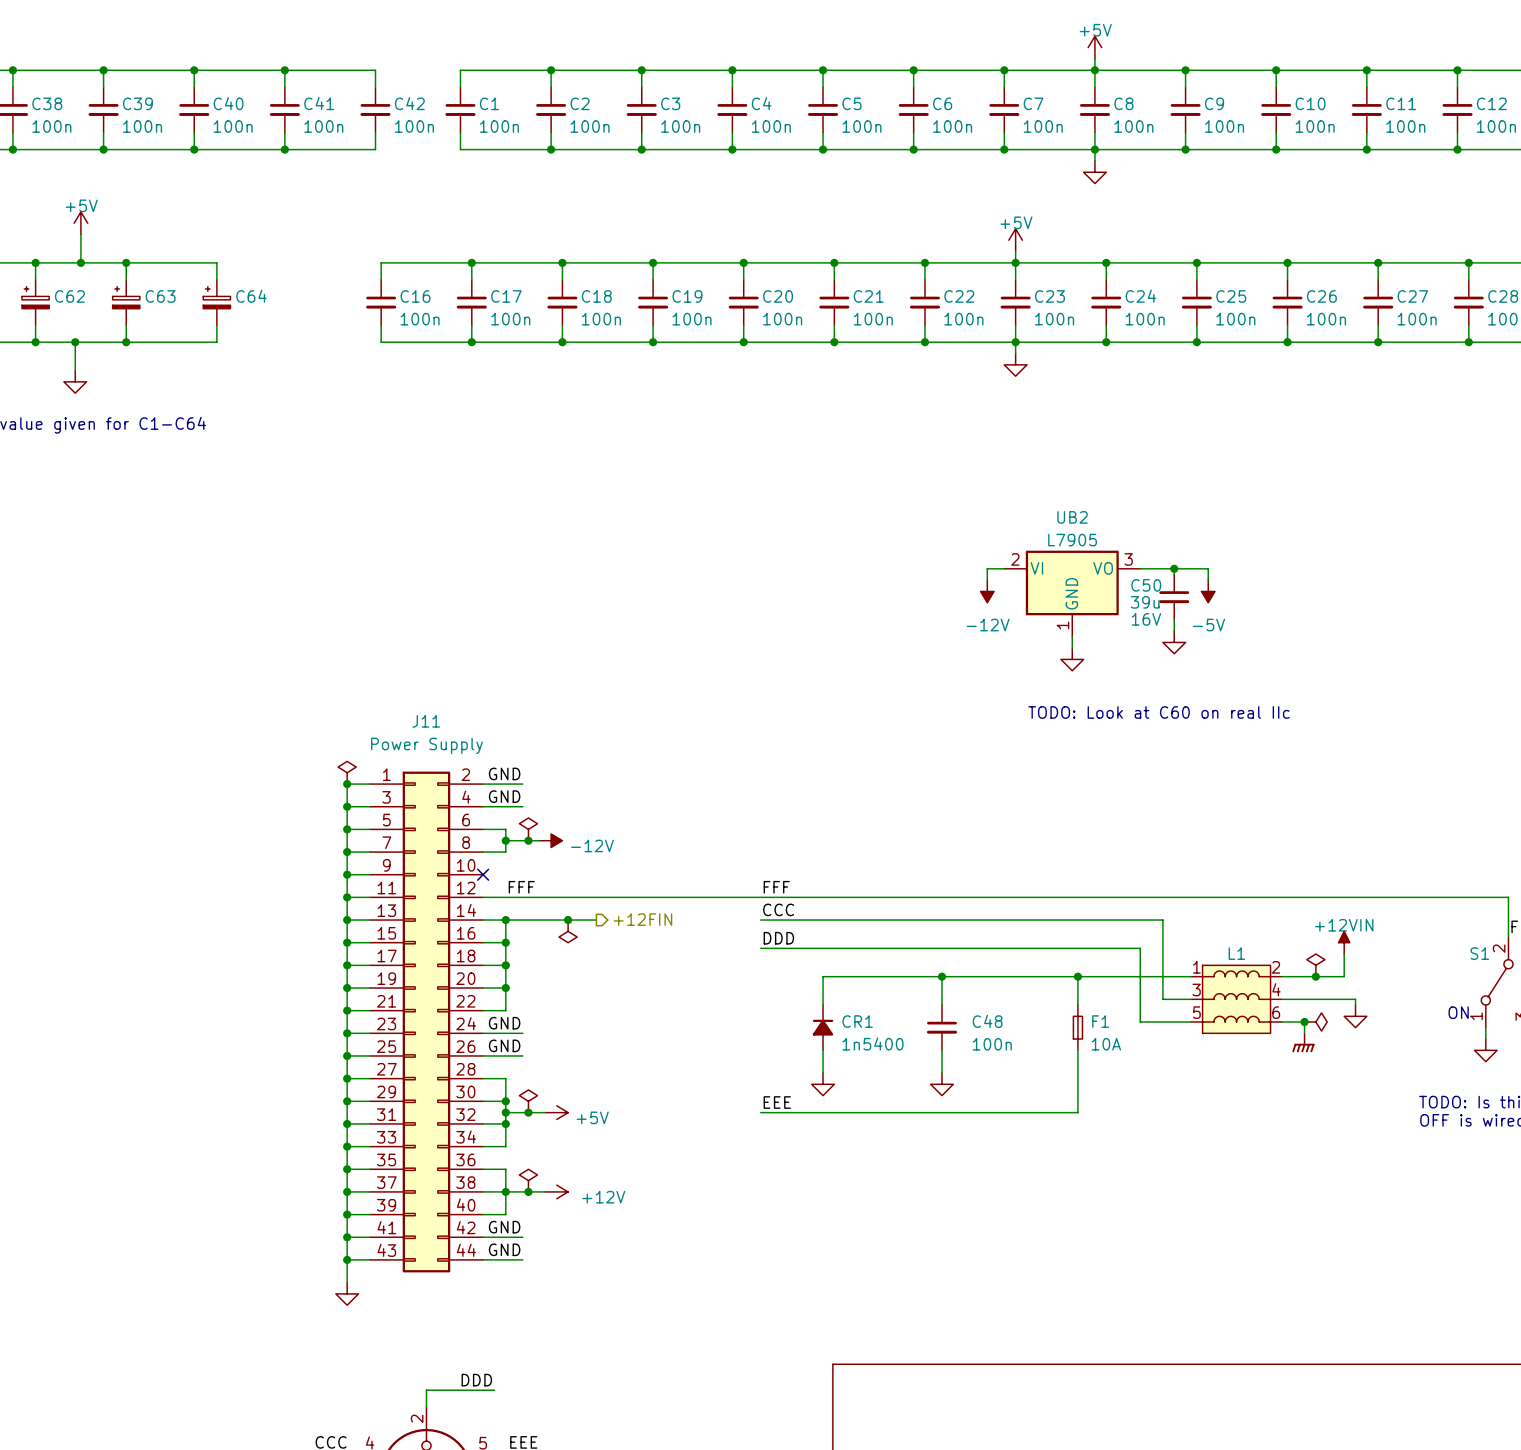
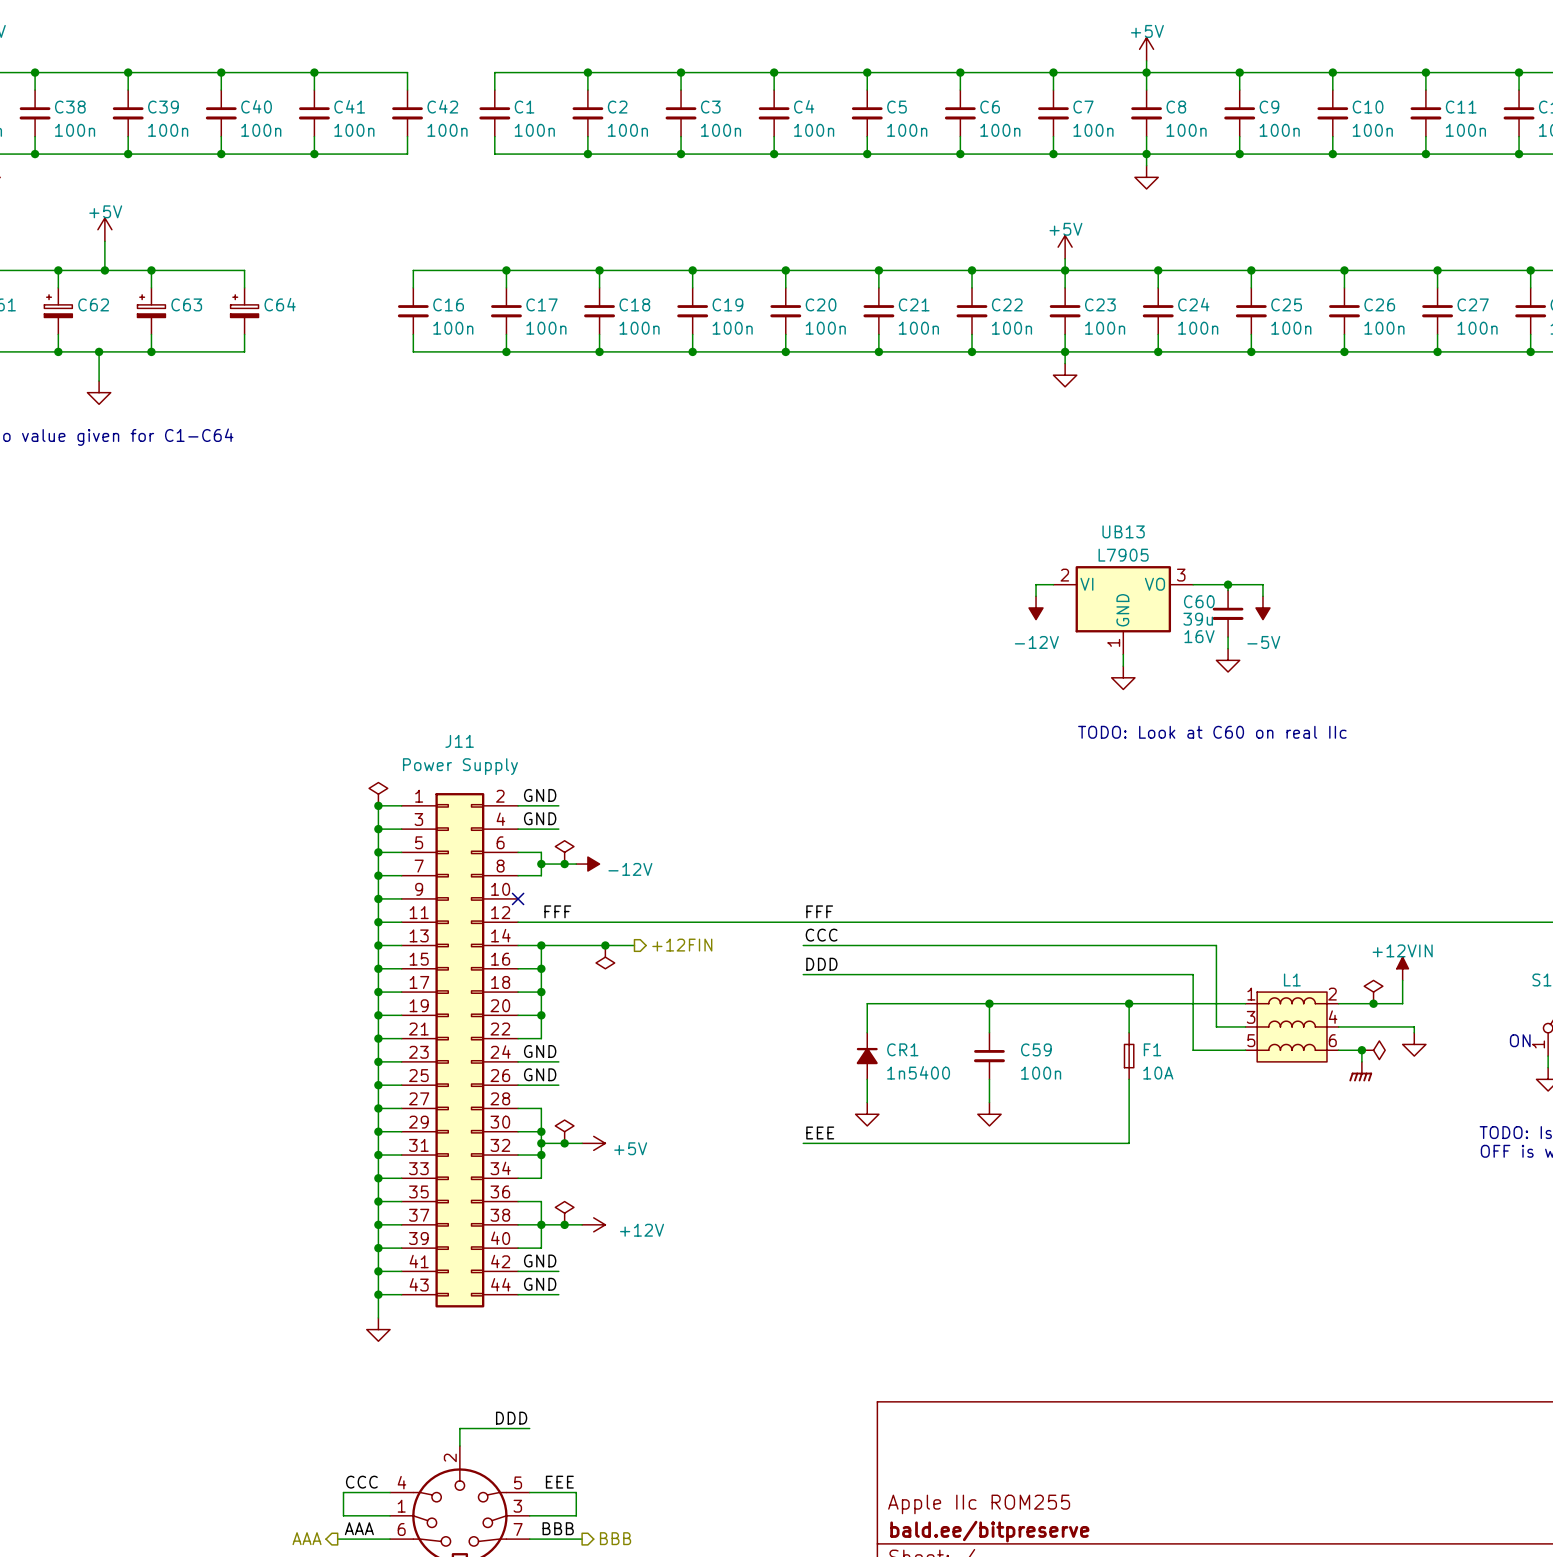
UB2 name: UB2 (1072, 517) -> UB13 (1123, 531)
C50 name: C50 (1146, 585) -> C60 (1199, 601)
C48 name: C48 (987, 1021) -> C59 (1036, 1049)

